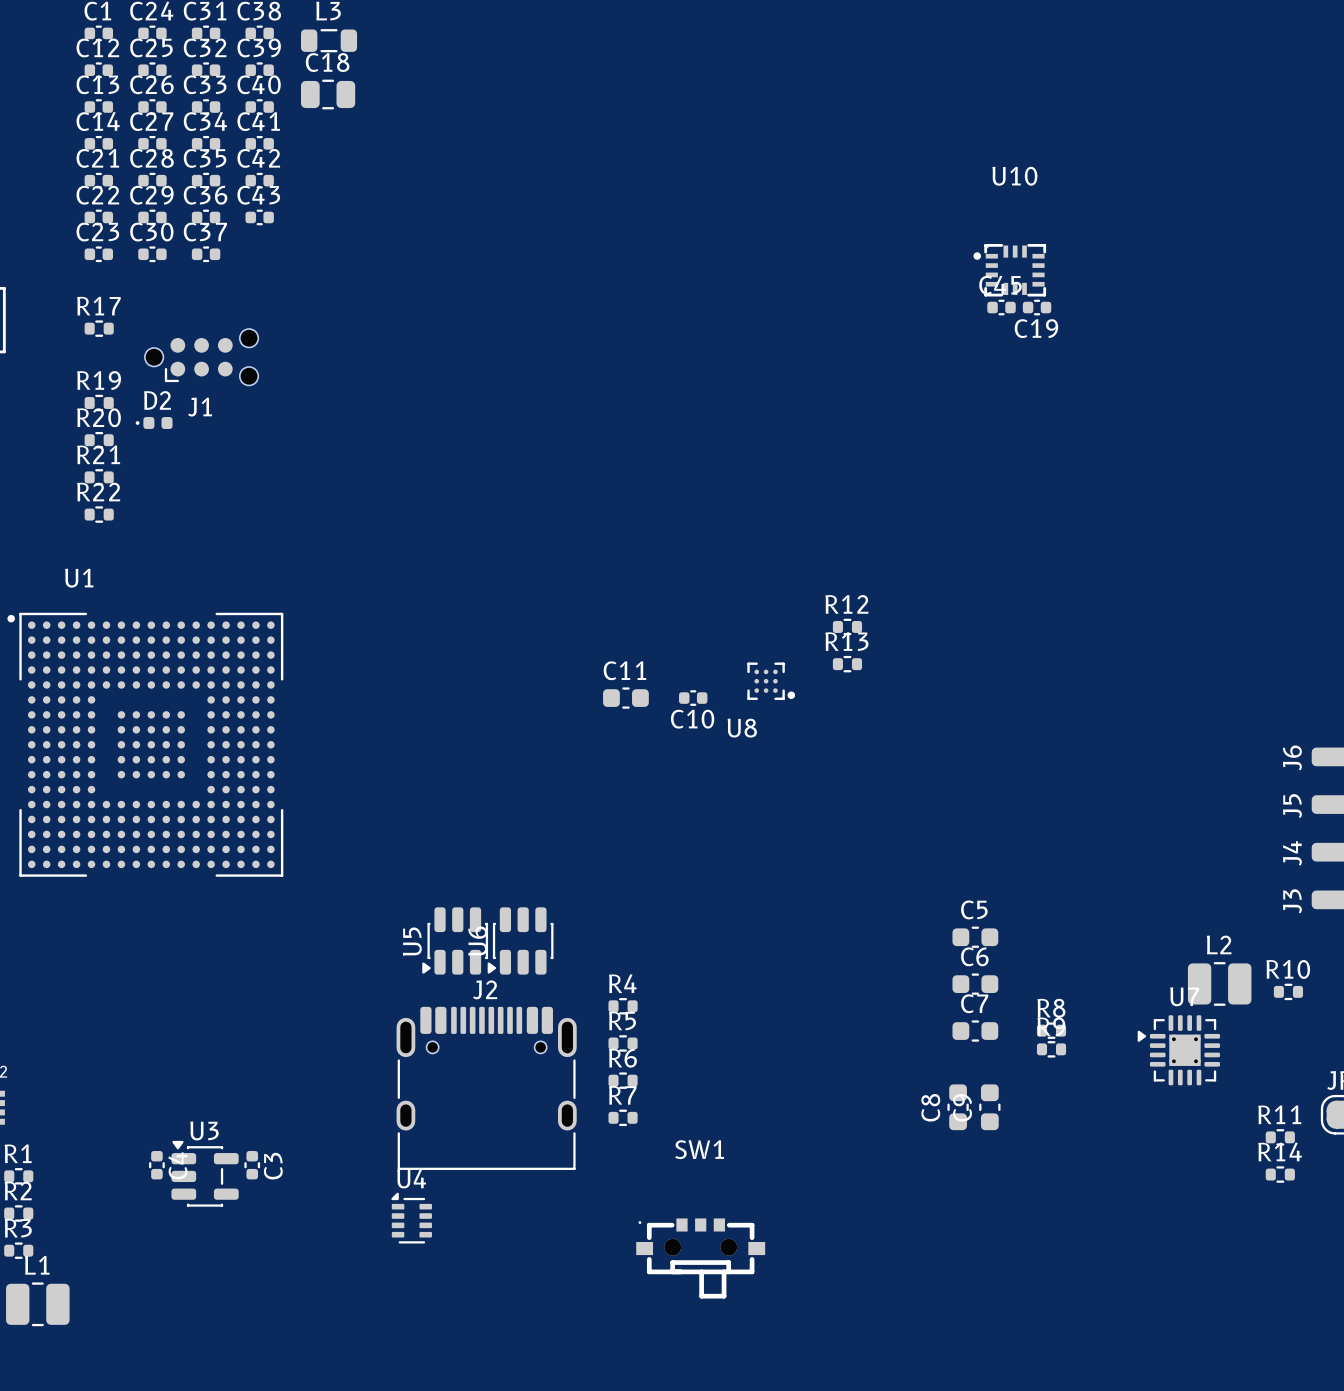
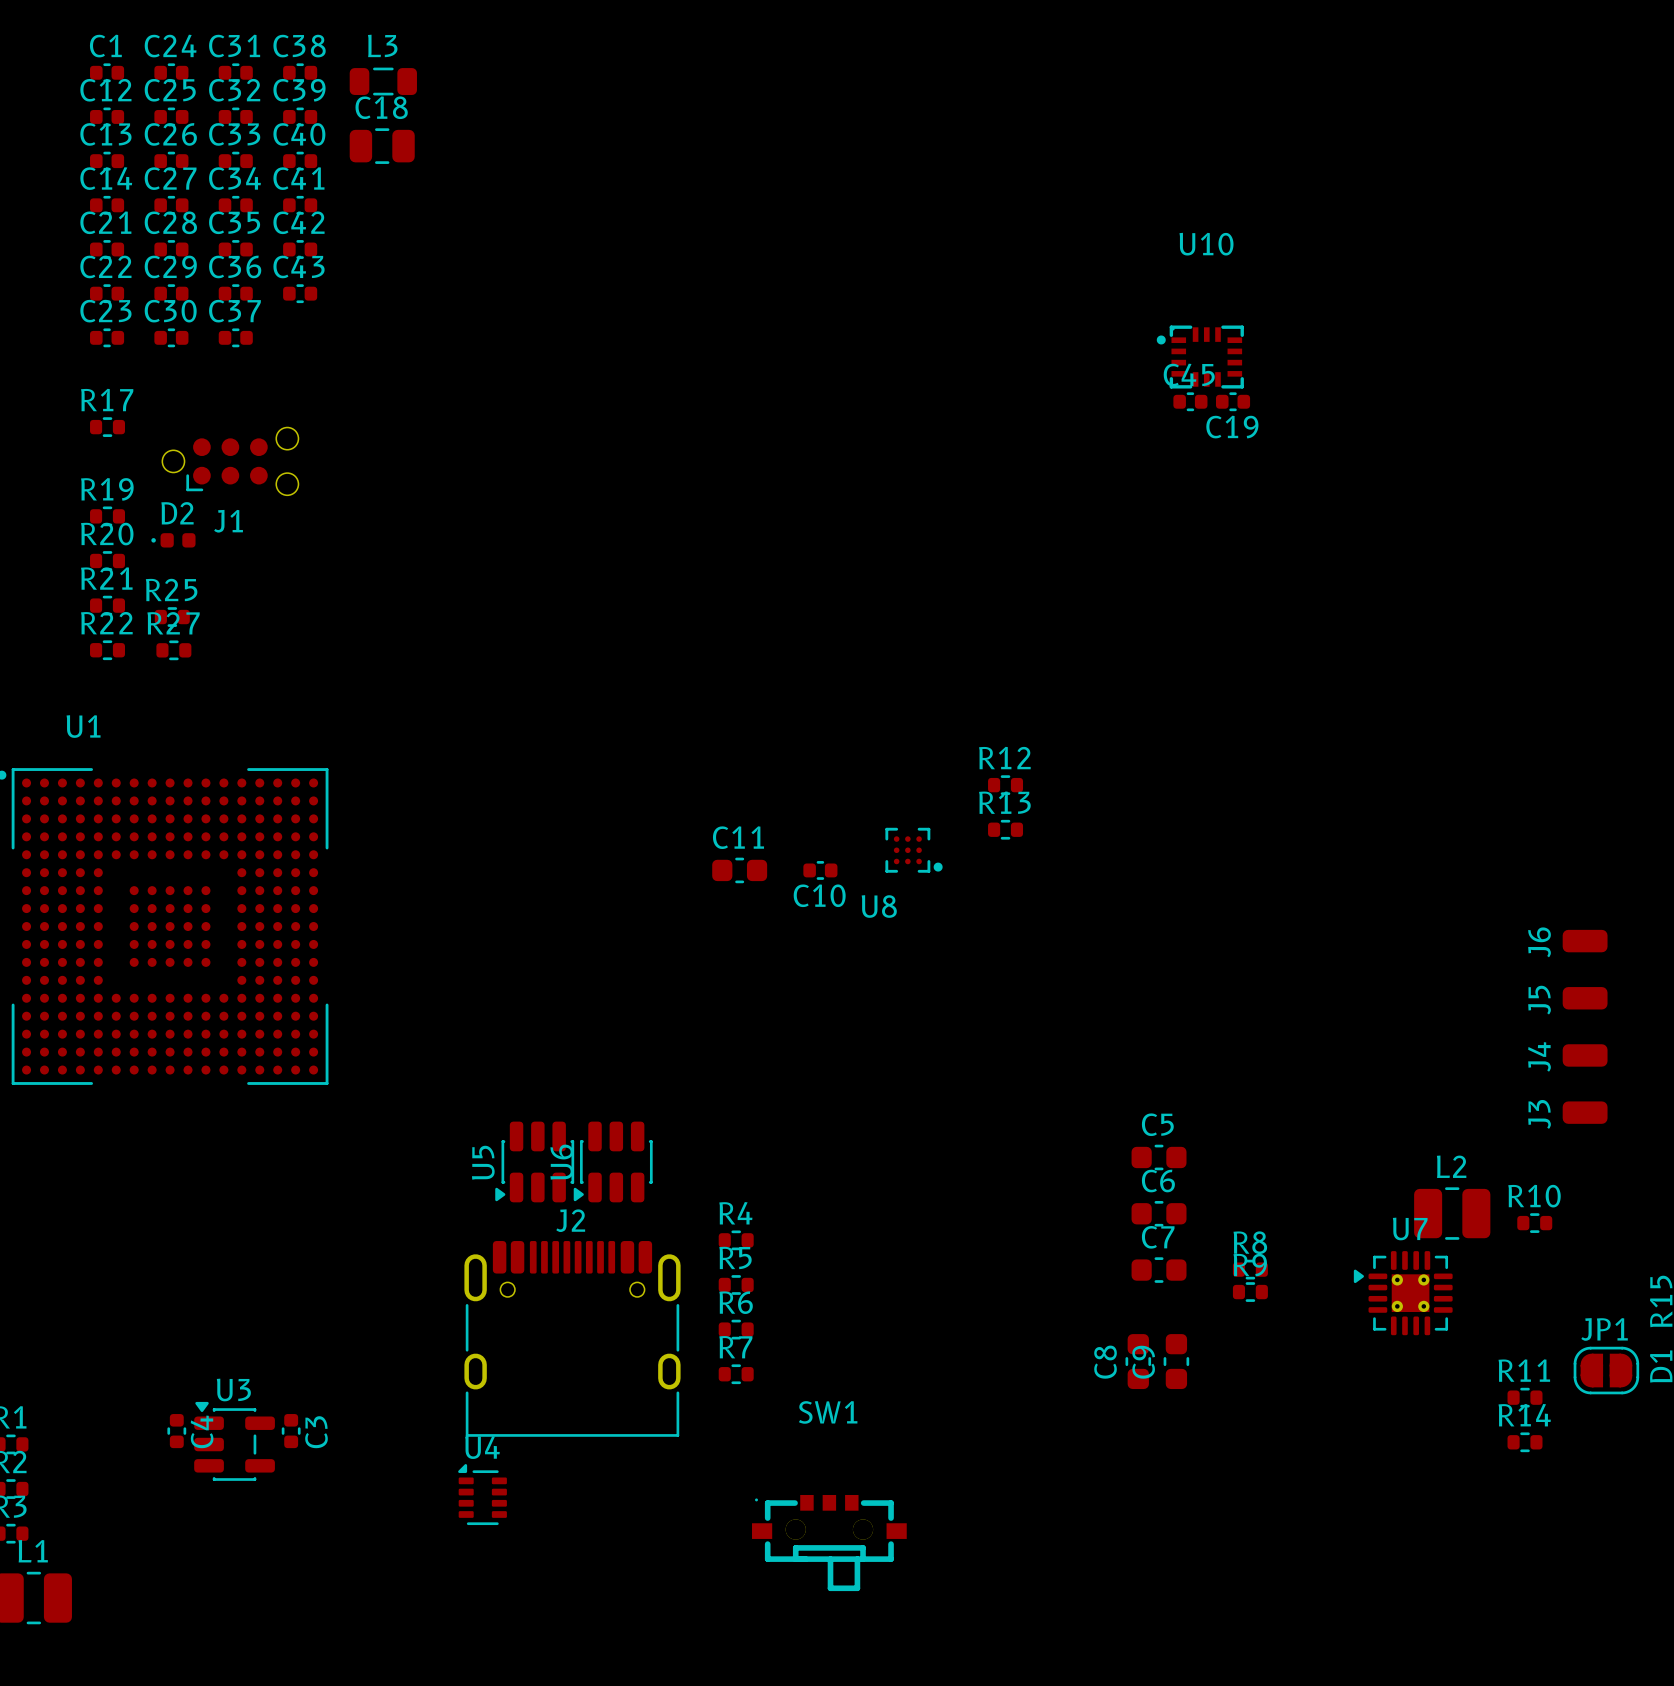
R25: none -> (172, 617)
R27: none -> (173, 650)

